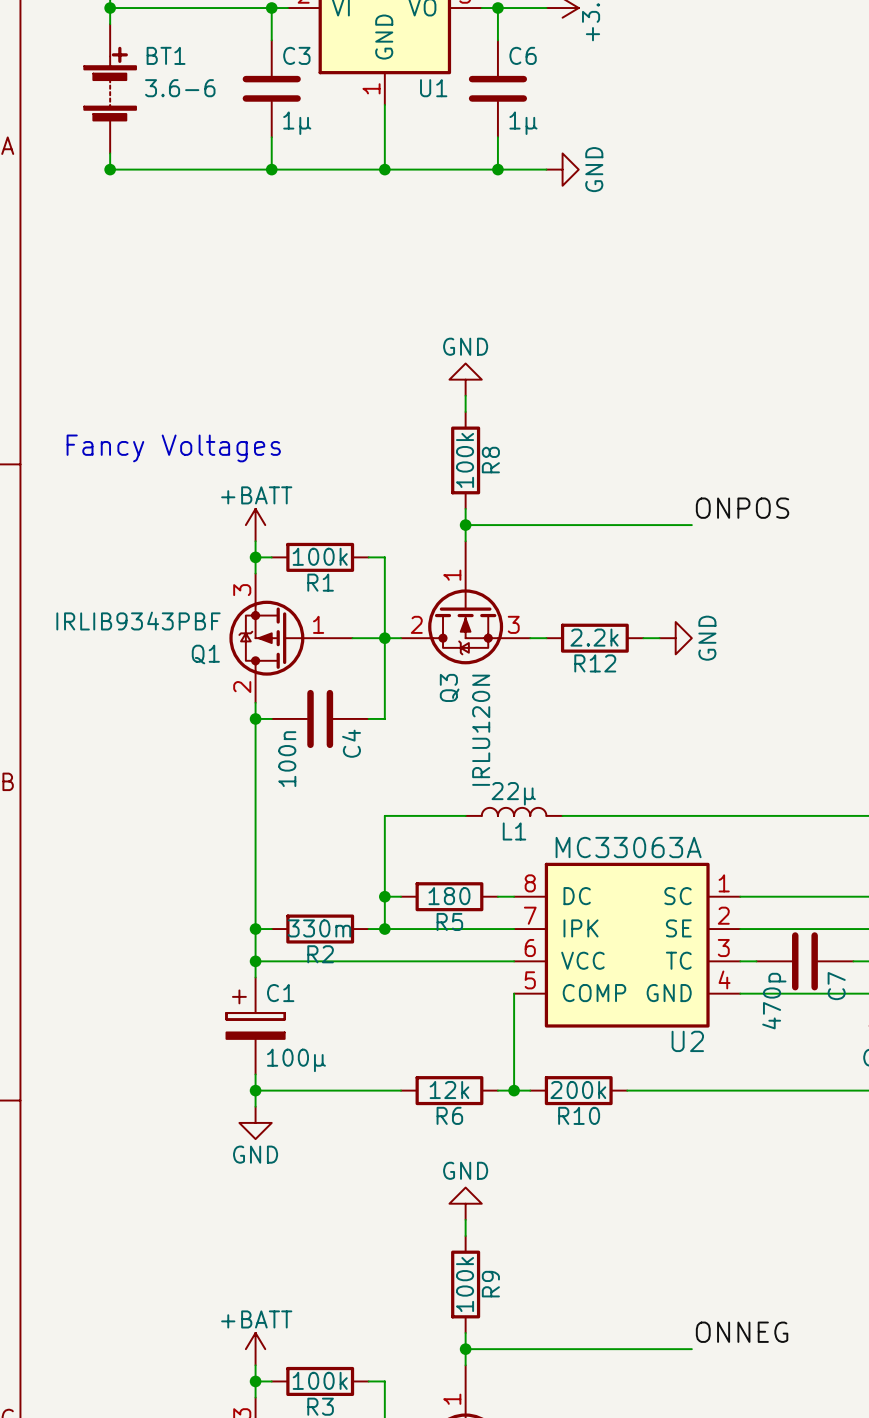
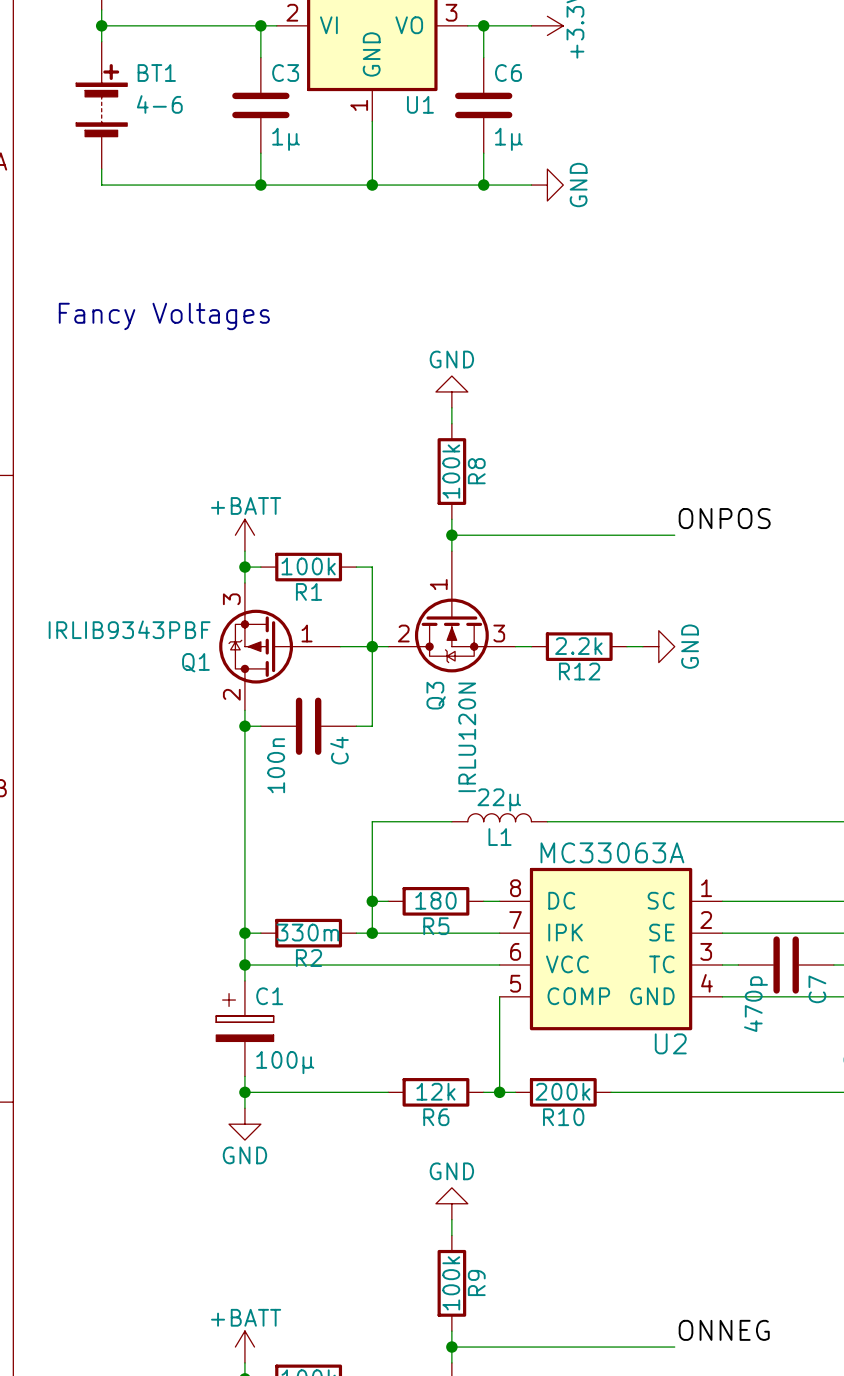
BT1 value: 3.6-6 (180, 88) -> 4-6 (159, 104)
junction: (110, 169) -> none
text position: Fancy Voltages (173, 448) -> Fancy Voltages (164, 316)

